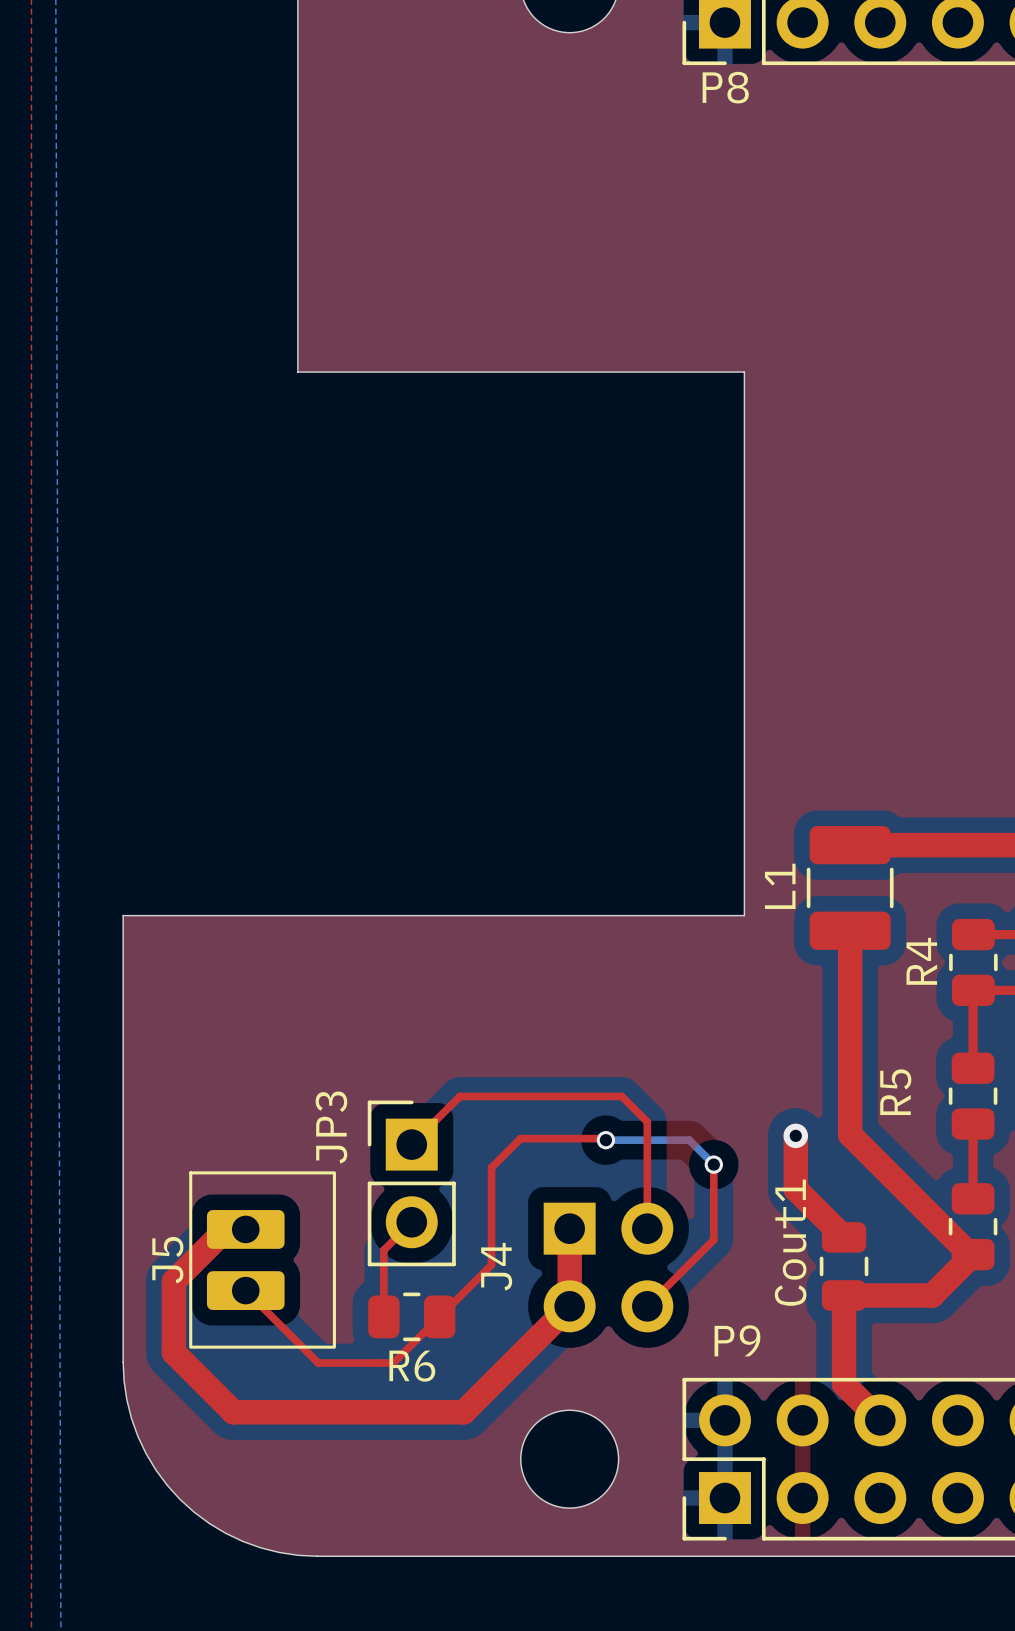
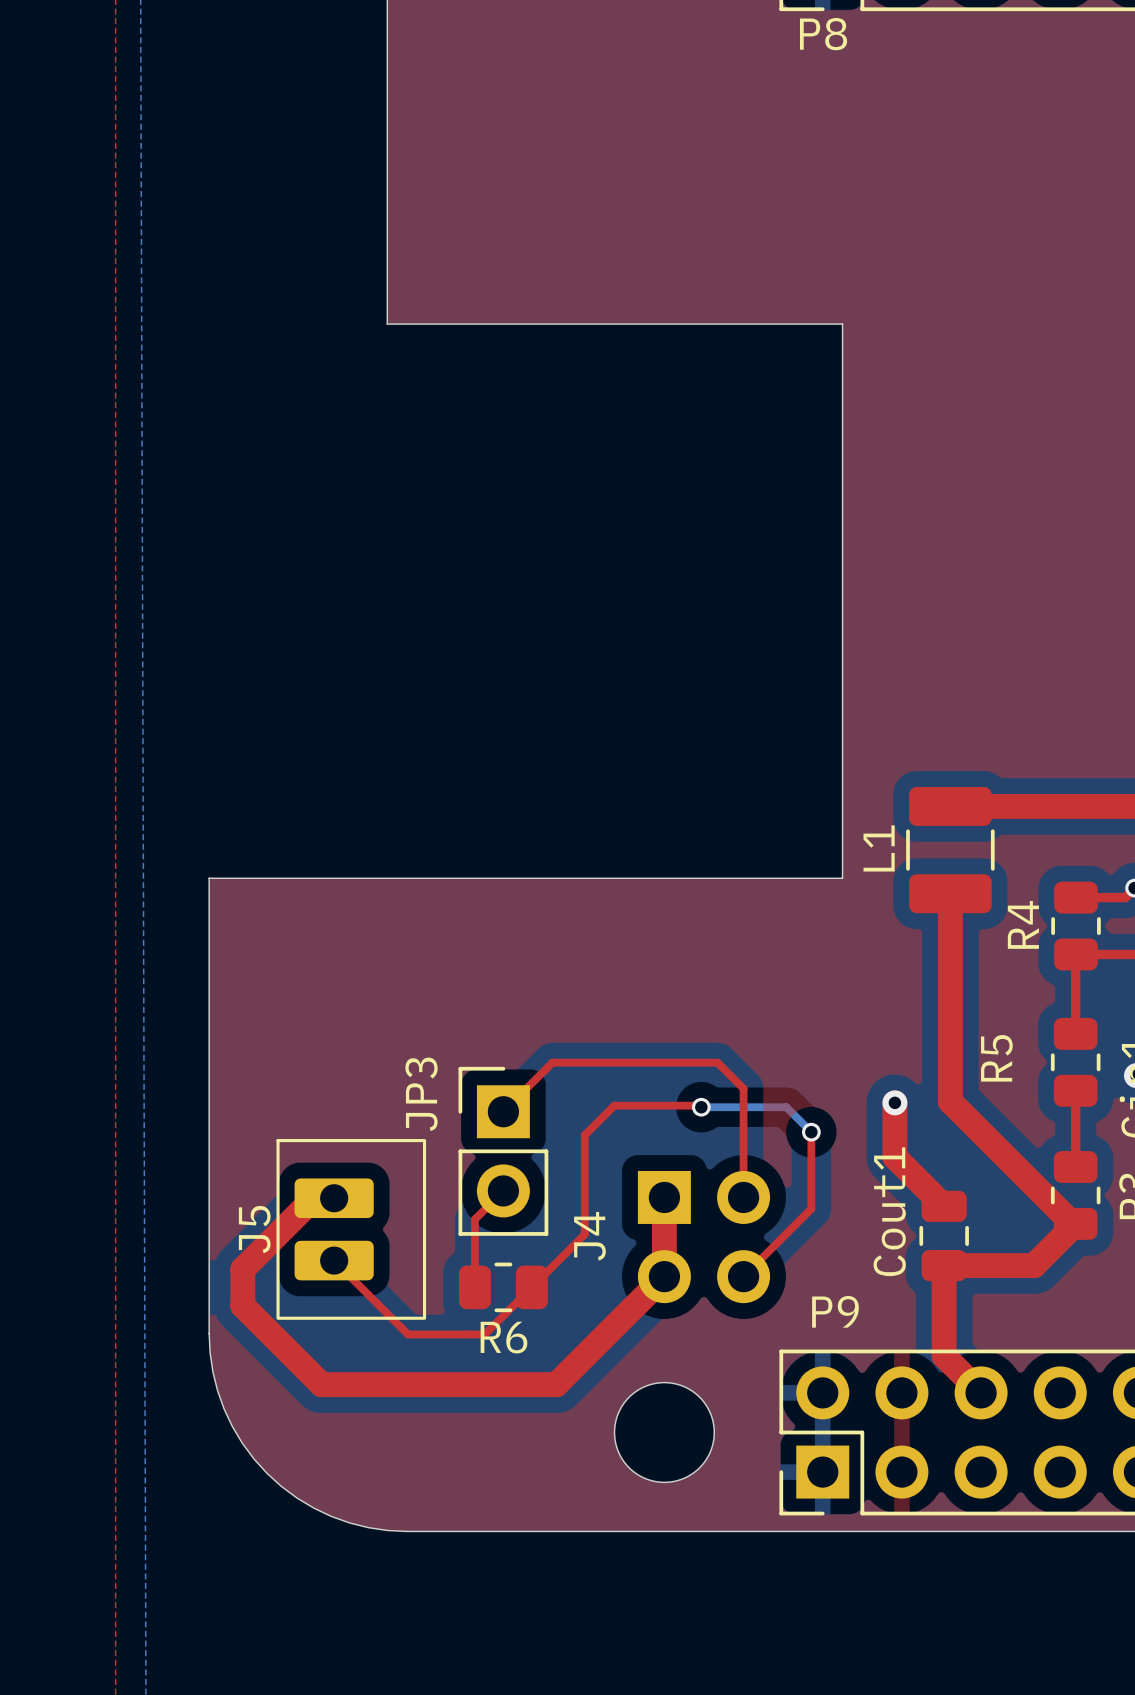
top track: (173, 1281) (173, 1352) -> (260, 1251) (242, 1269) (242, 1305) (260, 1323)

